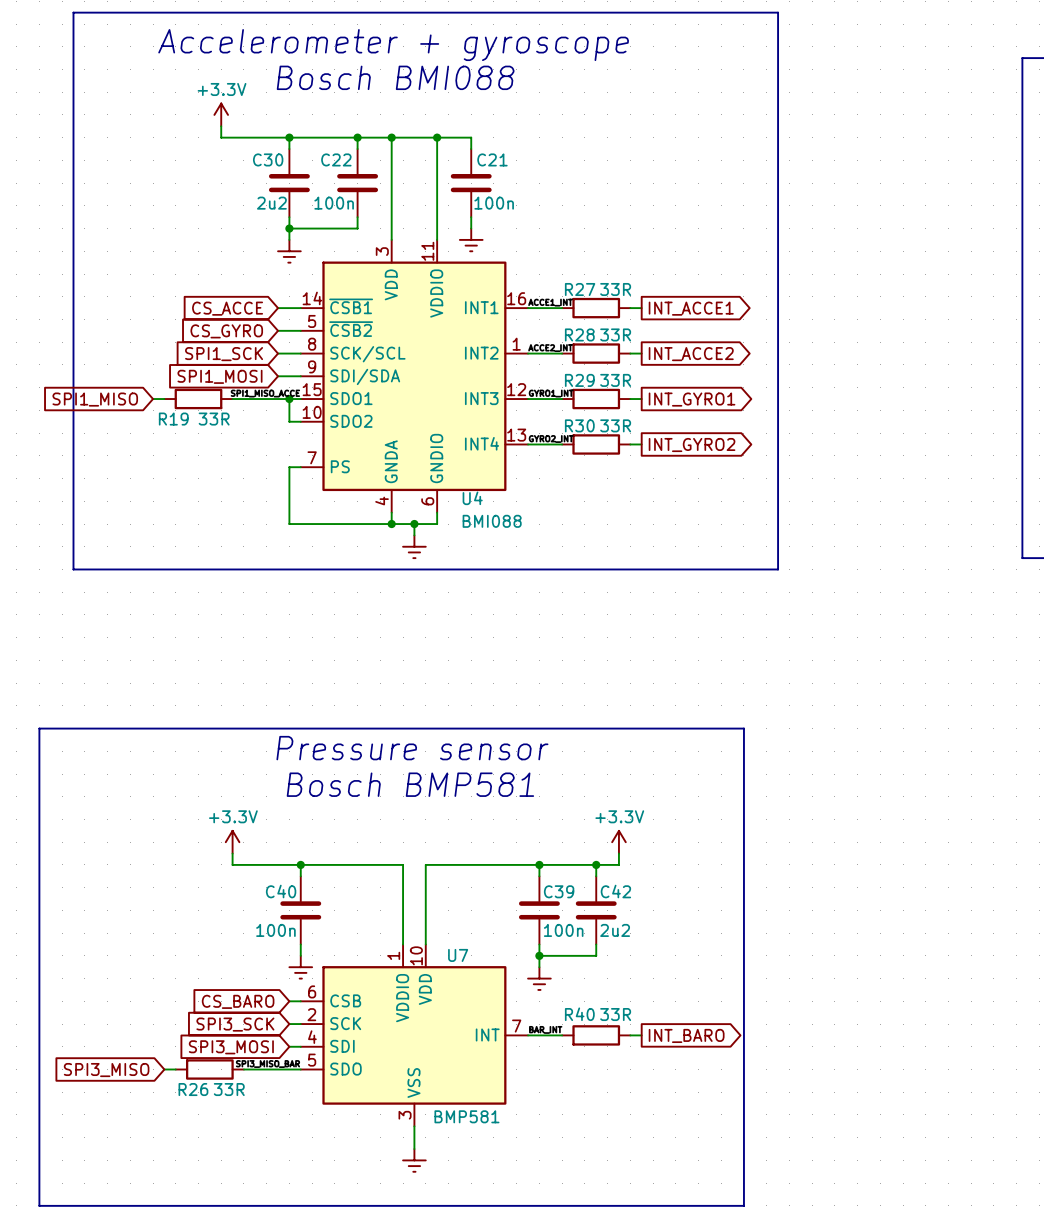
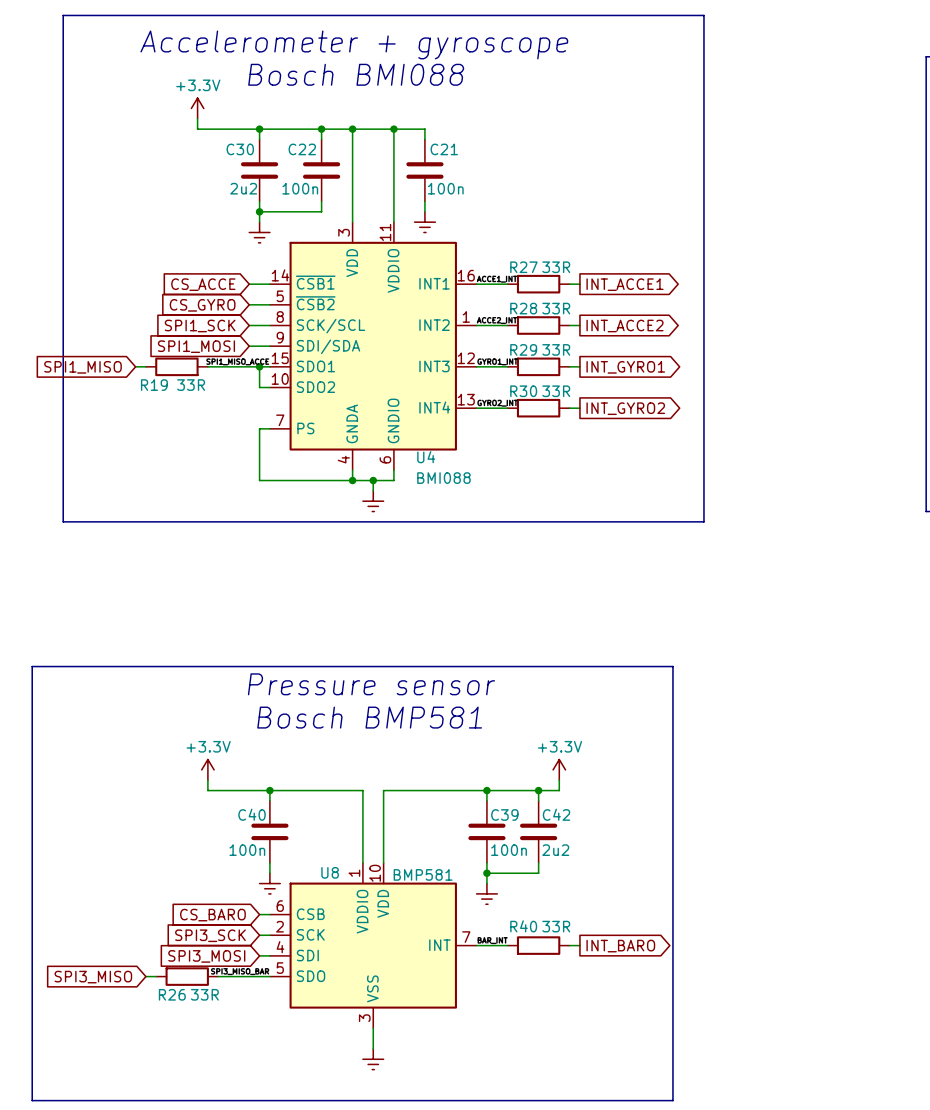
U7 name: U7 (458, 955) -> U8 (330, 872)
U7 value position: BMP581 (466, 1116) -> BMP581 (423, 874)

